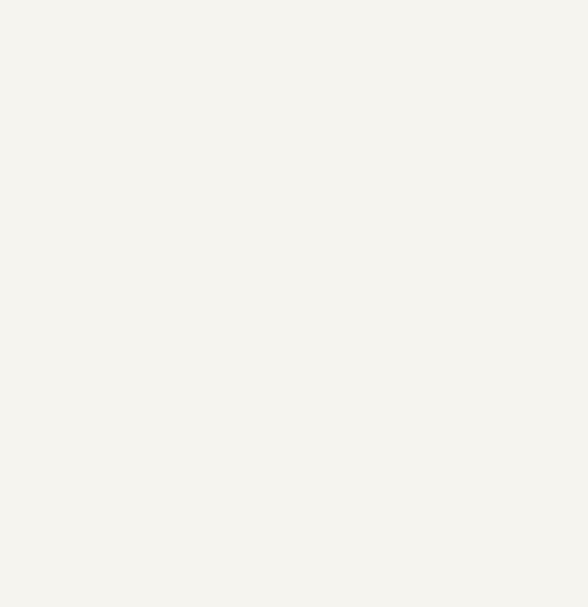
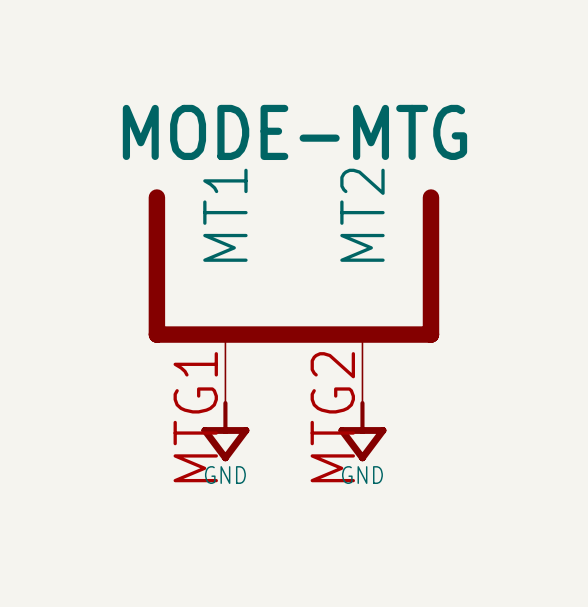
MODE-MTG: none -> (293, 296)
power symbol: none -> GND (225, 431)
power symbol: none -> GND (362, 431)

